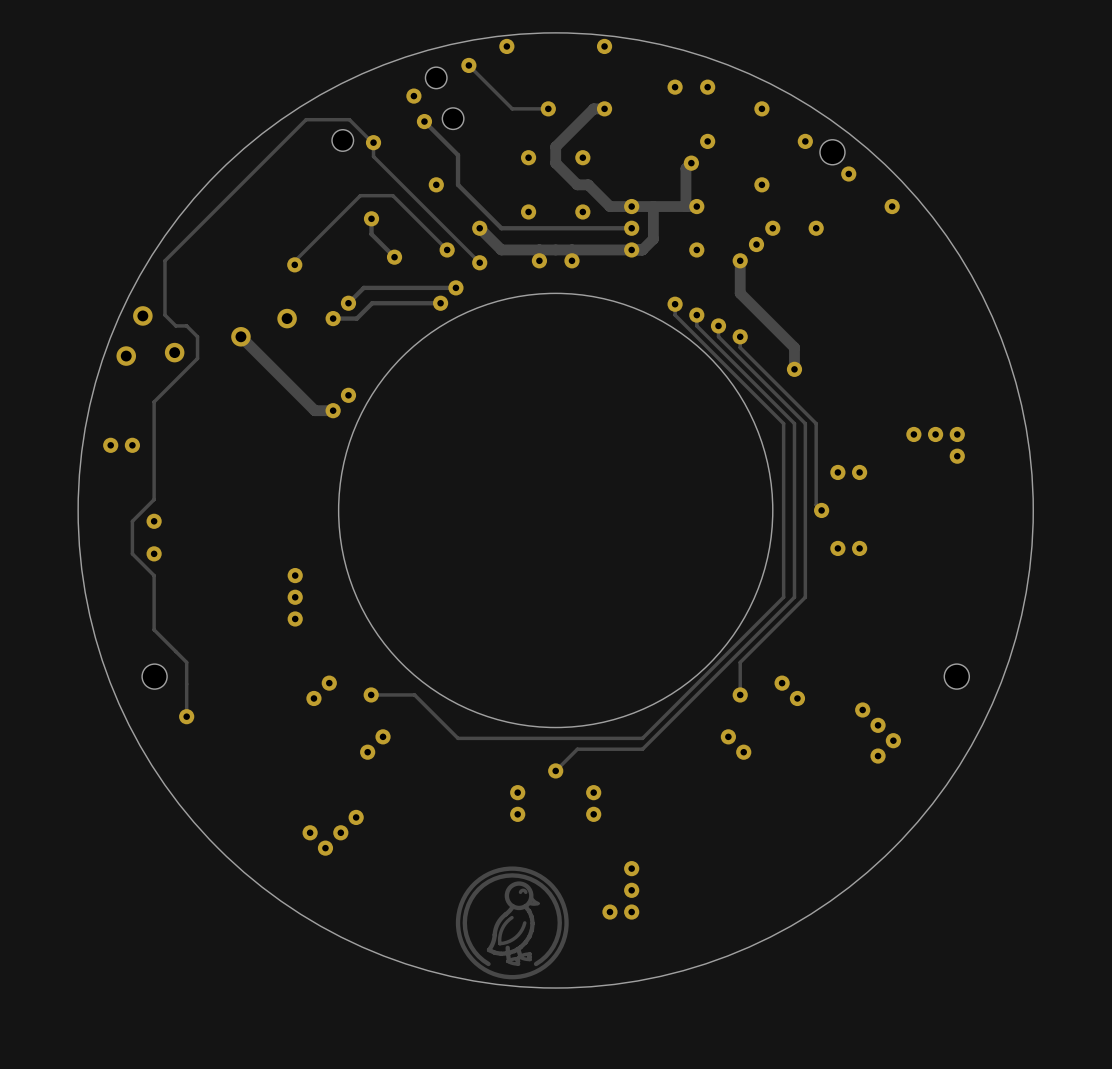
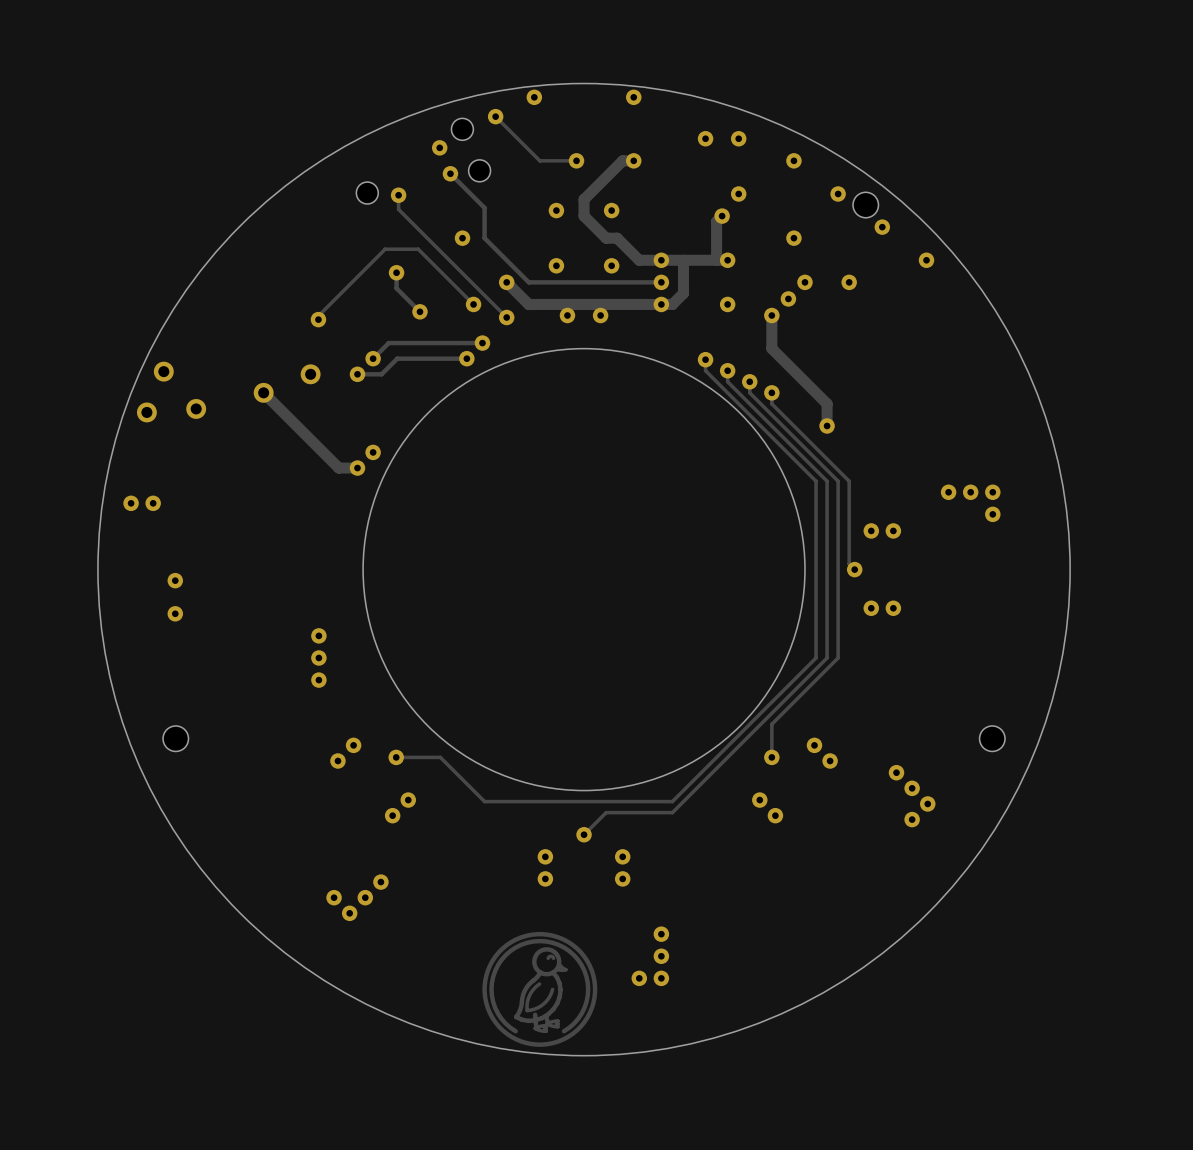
track: (373, 142) (349, 119) (306, 119) (164, 260) (164, 315) (175, 325) (186, 325) (197, 336) (197, 358) (154, 401) (154, 499) (132, 521) (132, 553) (154, 575) (154, 629) (186, 662) (186, 716) -> none
via: (186, 716) -> none

